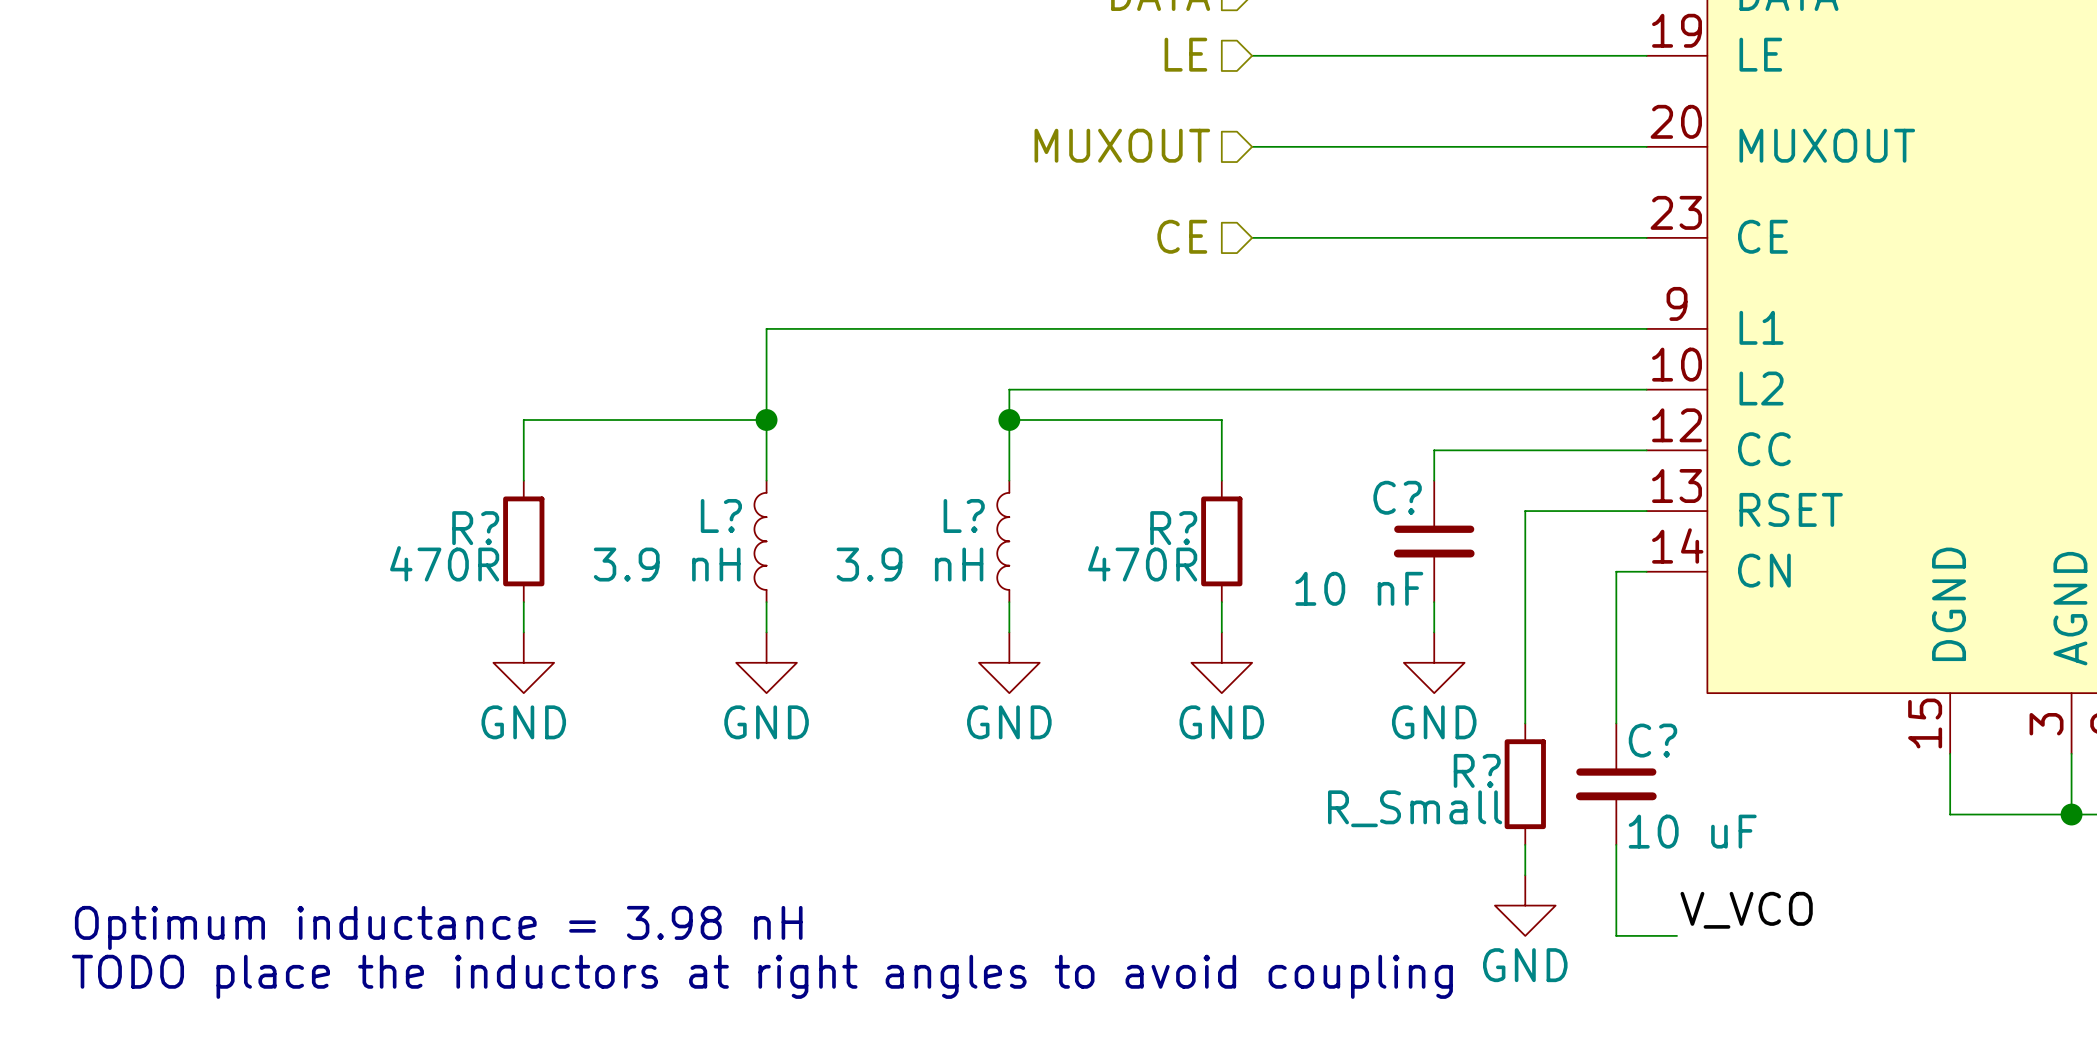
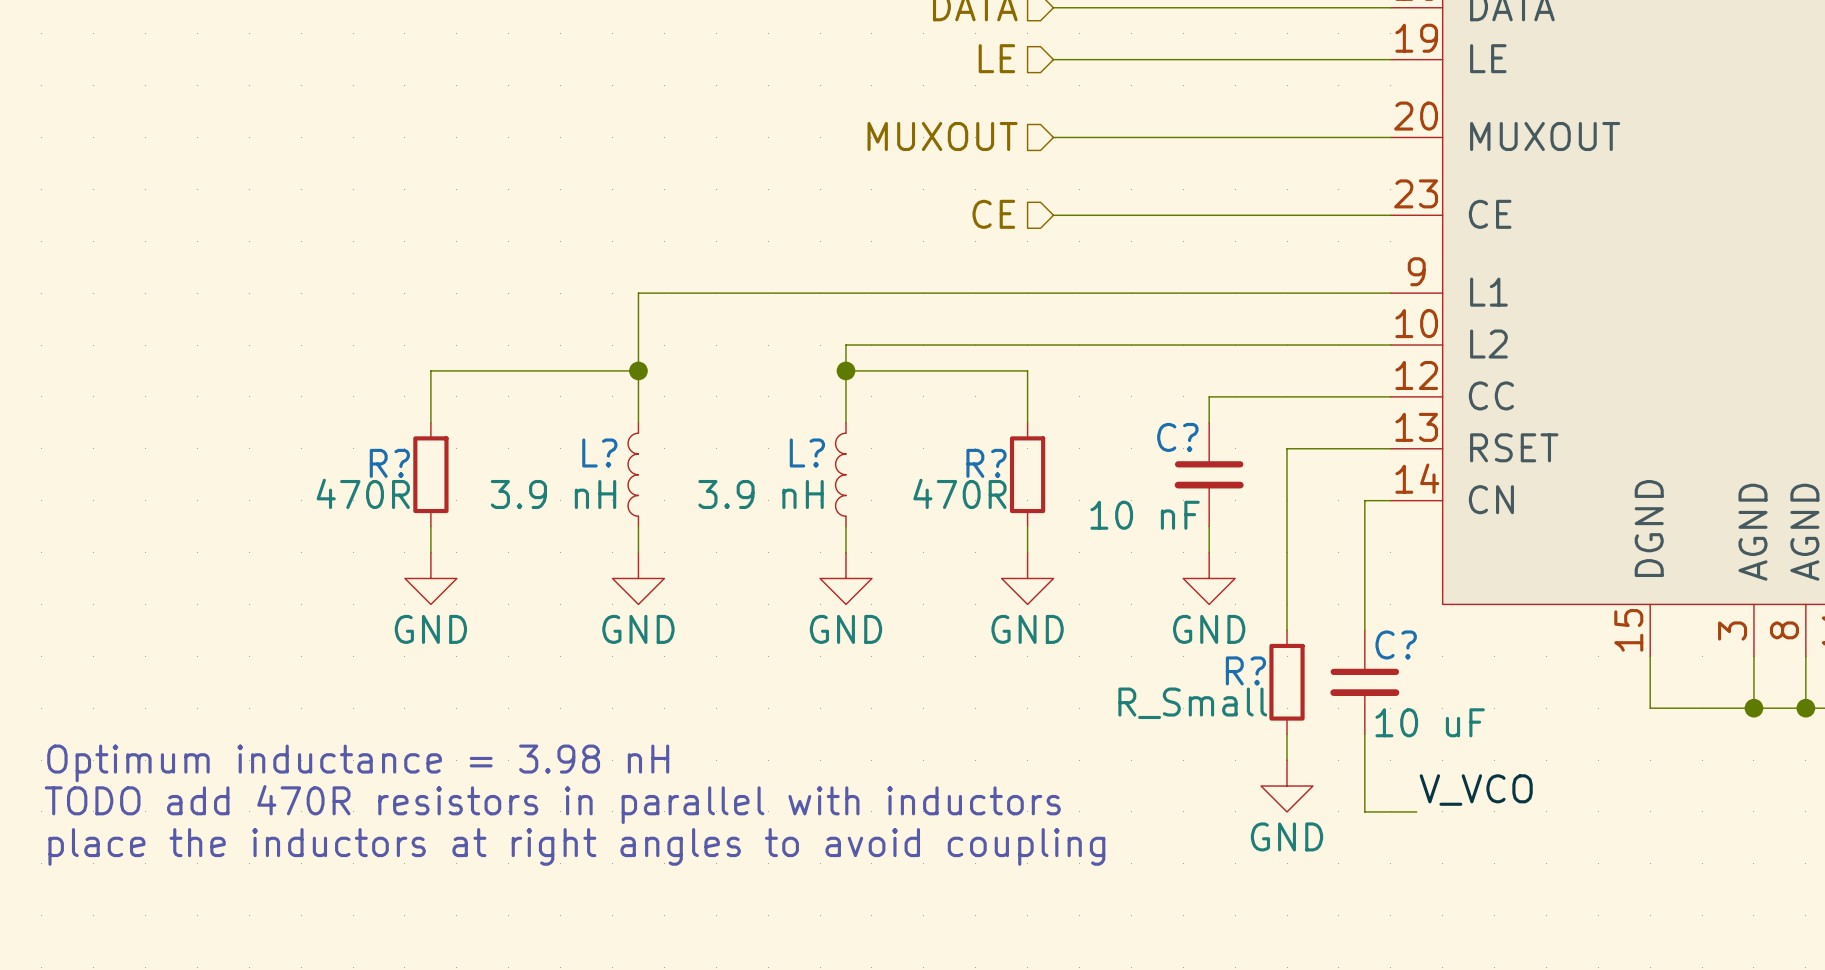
text: none -> Optimum inductance = 3.98 nH (358, 763)
text: Optimum inductance = 3.98 nH (438, 927) -> TODO add 470R resistors in parallel with inductors (552, 804)
text: TODO place the inductors at right angles to avoid coupling (762, 976) -> place the inductors at right angles to avoid coupling (576, 846)

